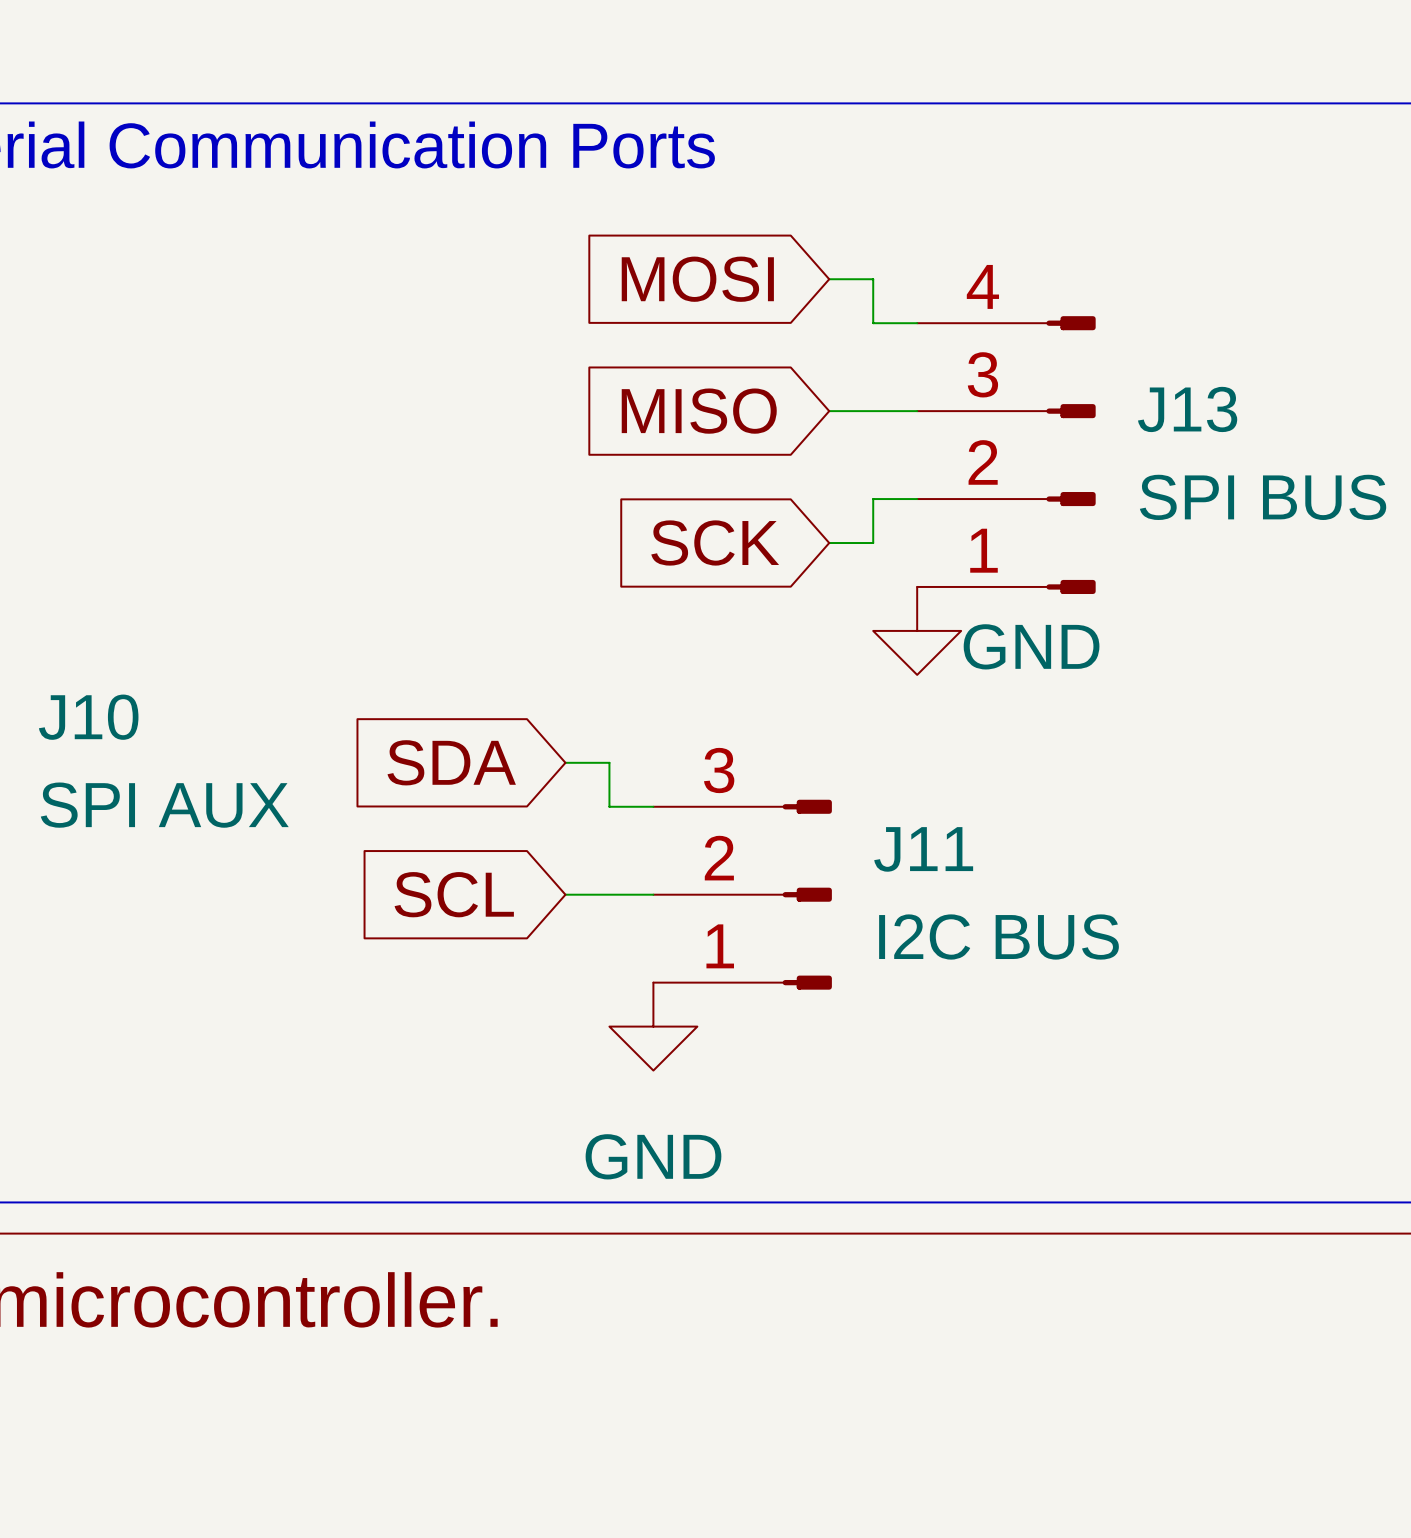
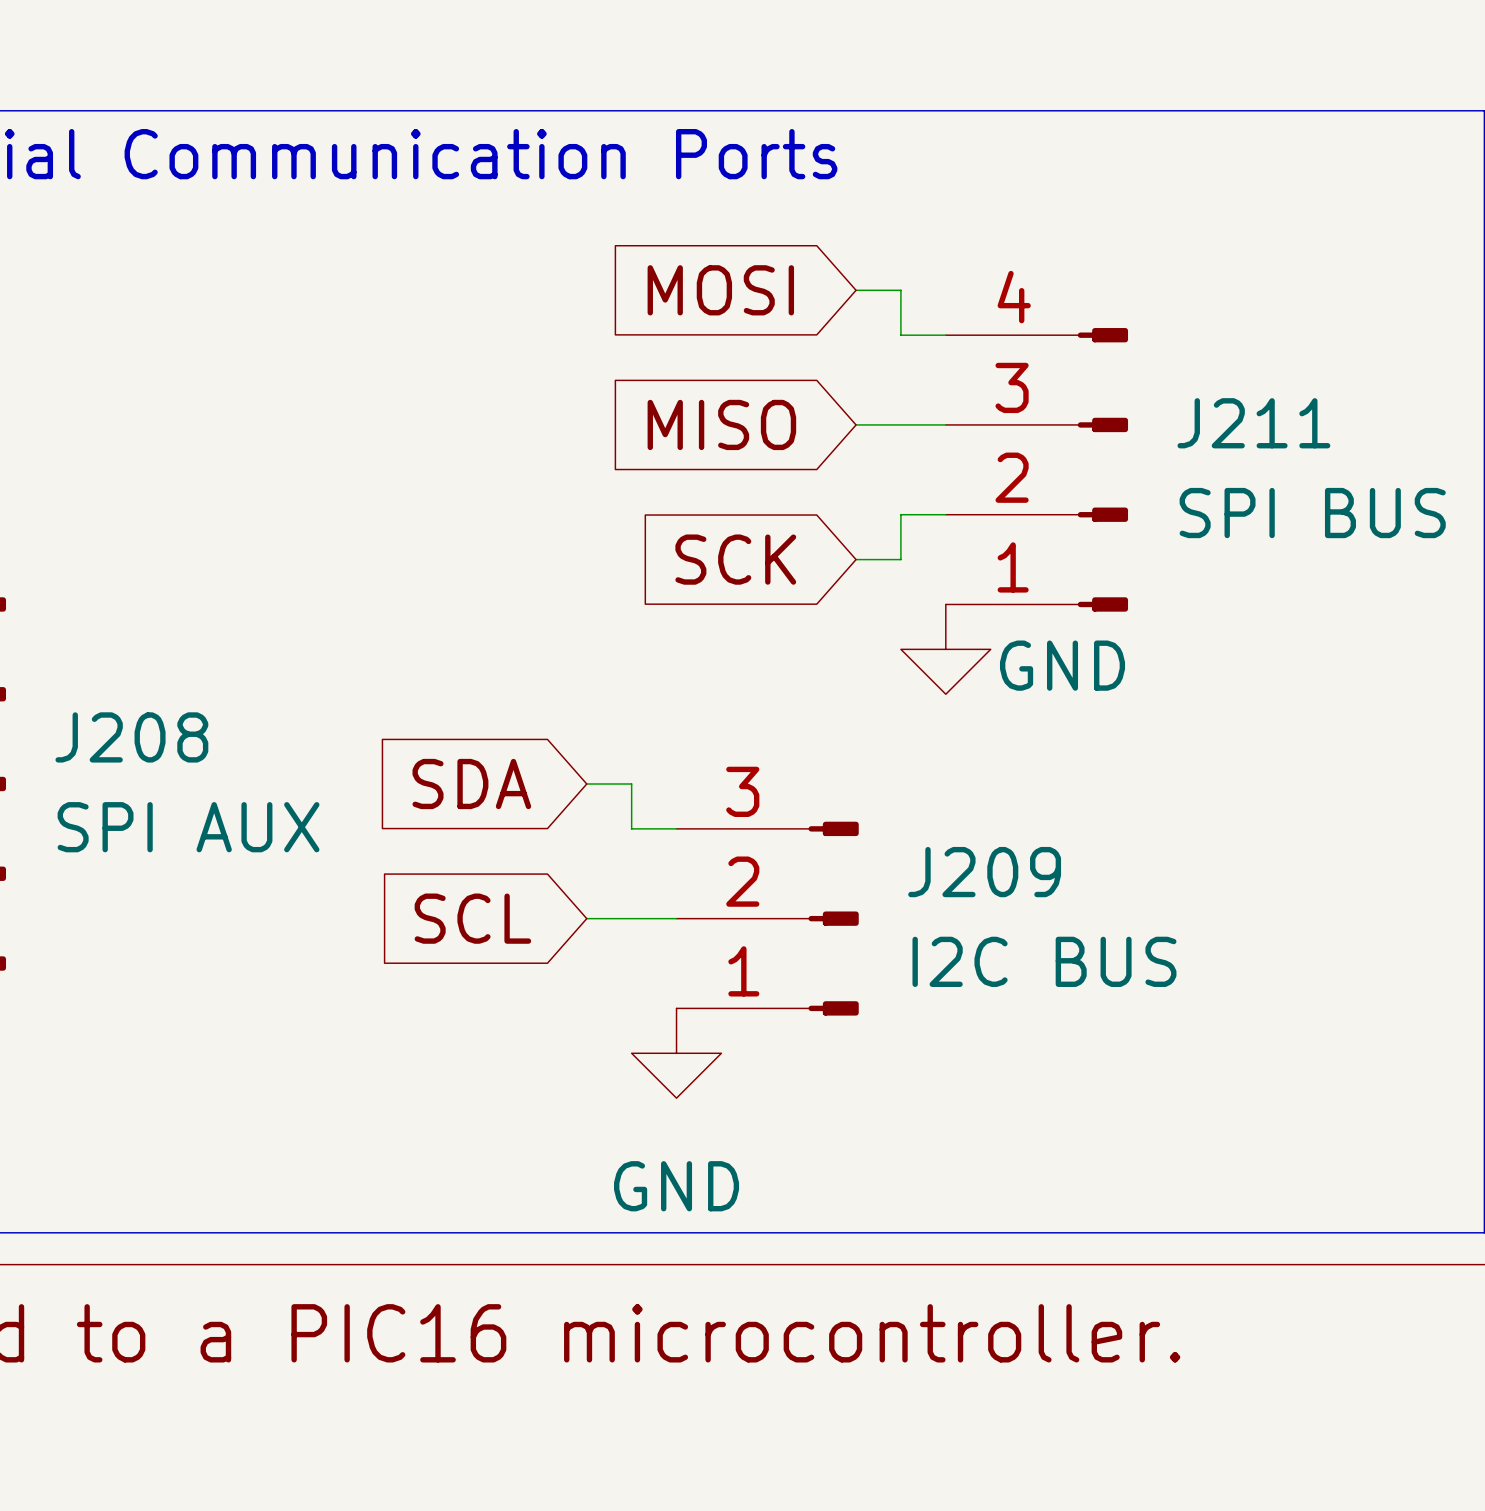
J13 name: J13 (1187, 409) -> J211 (1253, 423)
J10 name: J10 (88, 717) -> J208 (131, 737)
J11 name: J11 (923, 849) -> J209 (984, 872)

